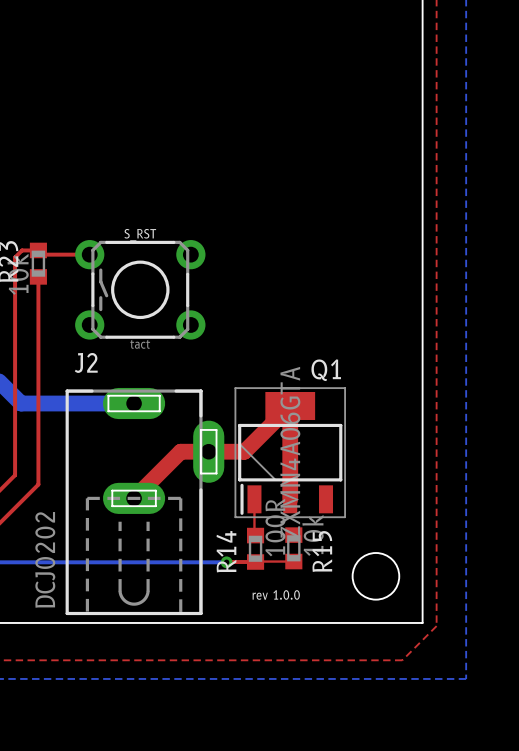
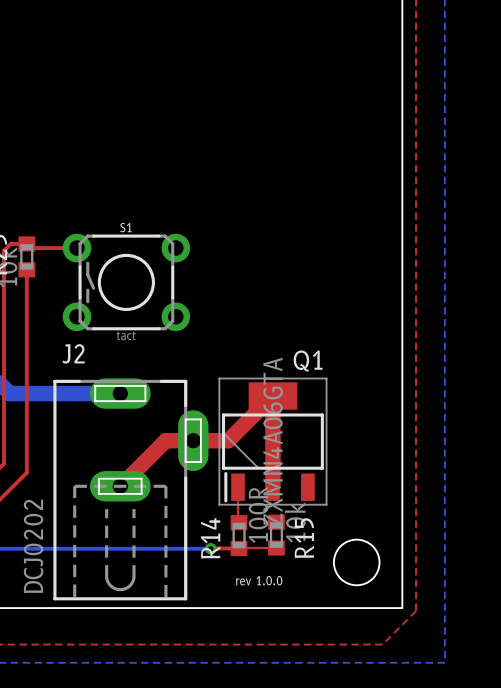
S_RST name: S_RST (140, 235) -> S1 (125, 227)

